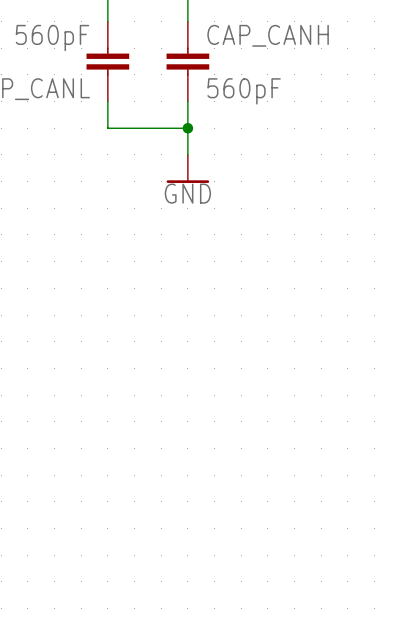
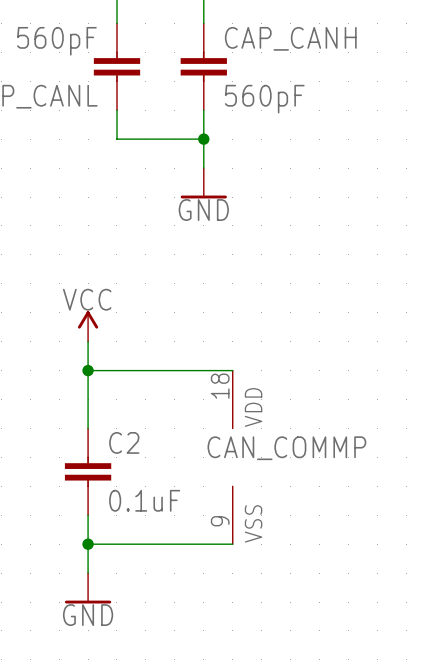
power symbol: none -> VCC (88, 326)
wire: none -> (88, 341) (88, 428)
wire: none -> (88, 370) (232, 370)
junction: none -> (88, 370)
CAN_COMMP: none -> (232, 457)
C2: none -> 0.1uF (88, 471)
wire: none -> (88, 515) (88, 573)
wire: none -> (88, 544) (232, 544)
junction: none -> (88, 544)
power symbol: none -> GND (88, 588)

